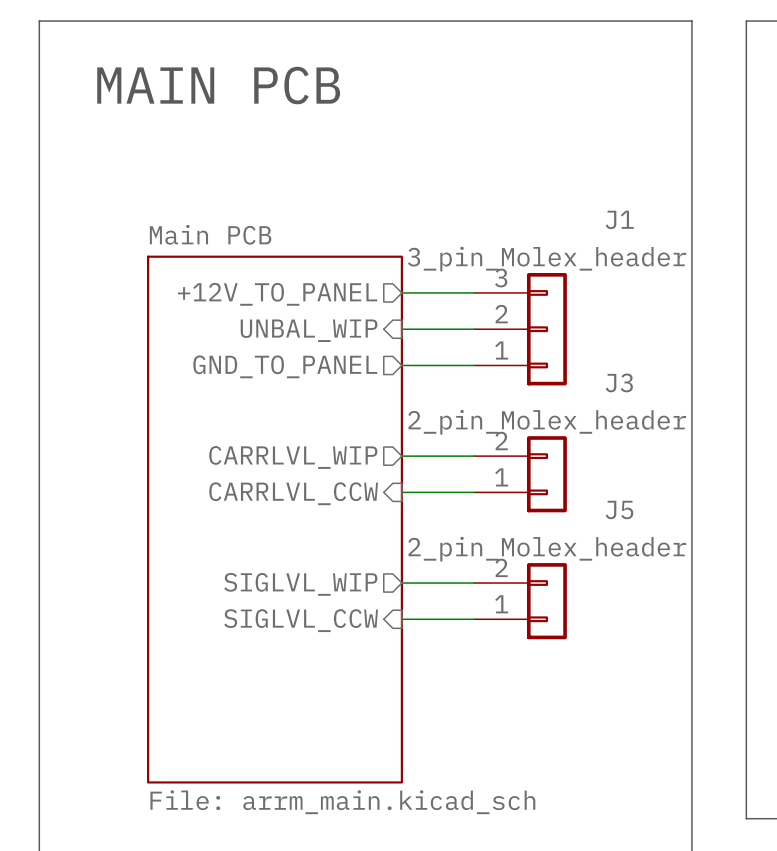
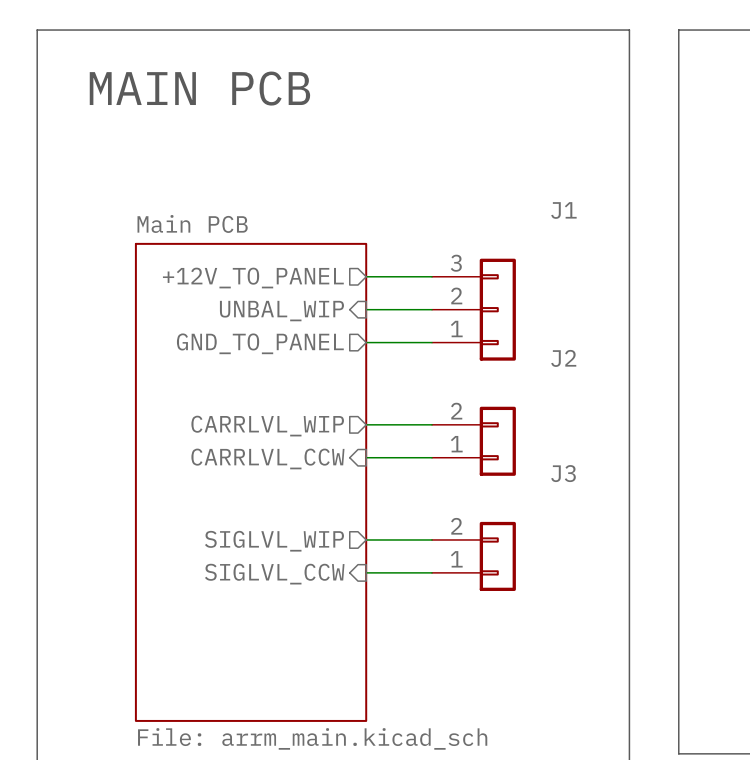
J1 value: 3_pin_Molex_header (547, 259) -> none
J3 name: J3 (619, 382) -> J2 (563, 358)
J3 value: 2_pin_Molex_header (547, 422) -> none
J5 name: J5 (619, 509) -> J3 (563, 473)
J5 value: 2_pin_Molex_header (547, 549) -> none

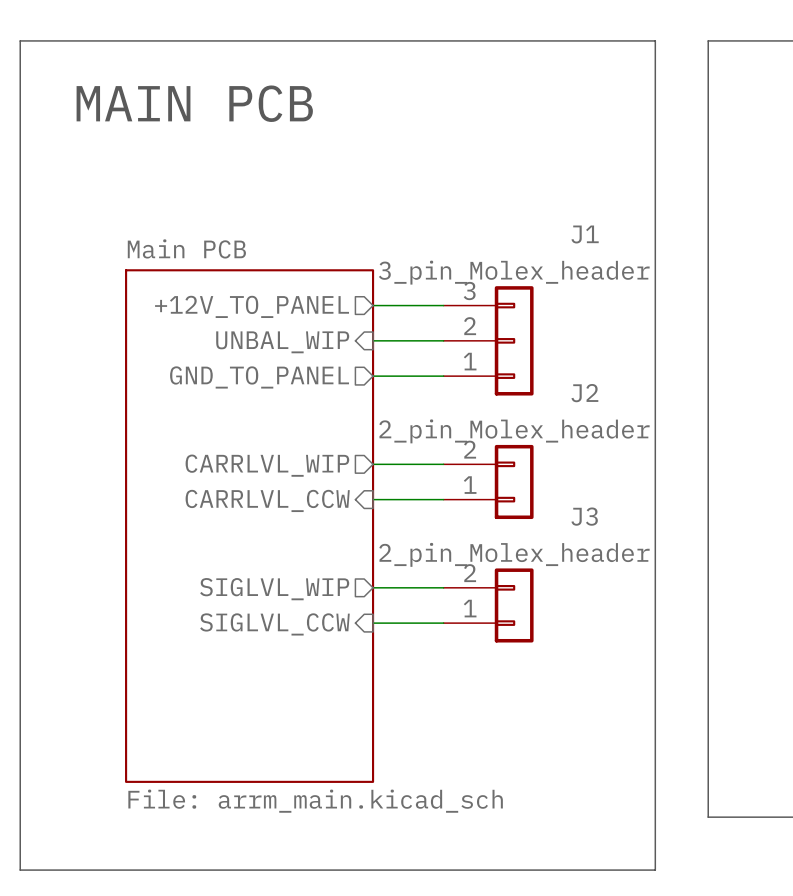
J1 value: none -> 3_pin_Molex_header (514, 272)
J2 value: none -> 2_pin_Molex_header (514, 431)
J3 value: none -> 2_pin_Molex_header (514, 554)

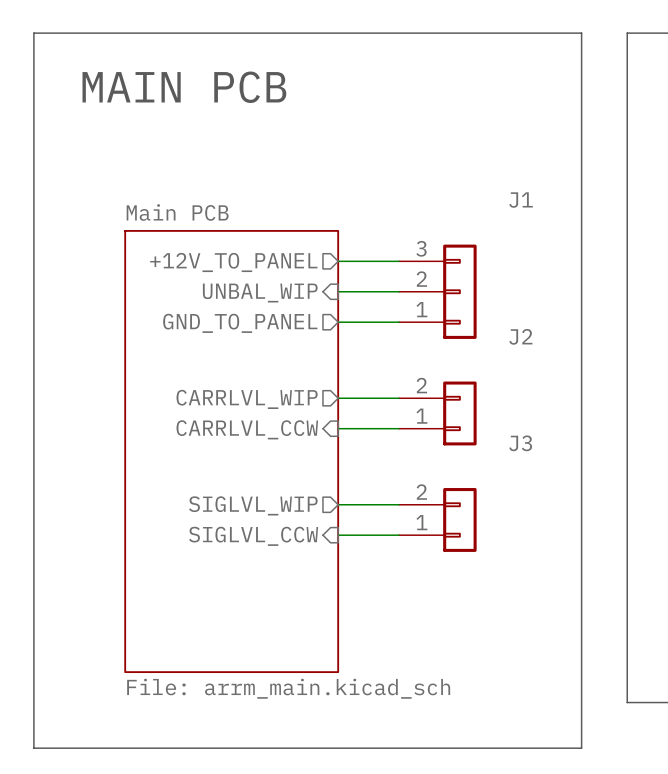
J1 value: 3_pin_Molex_header (514, 272) -> none
J2 value: 2_pin_Molex_header (514, 431) -> none
J3 value: 2_pin_Molex_header (514, 554) -> none

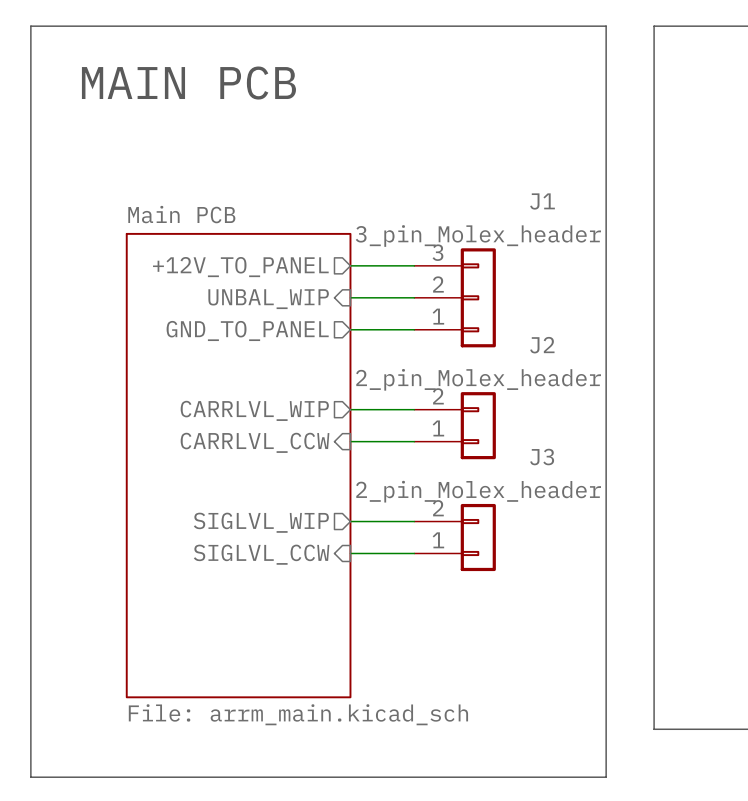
J1 value: none -> 3_pin_Molex_header (478, 236)
J2 value: none -> 2_pin_Molex_header (478, 379)
J3 value: none -> 2_pin_Molex_header (478, 491)

